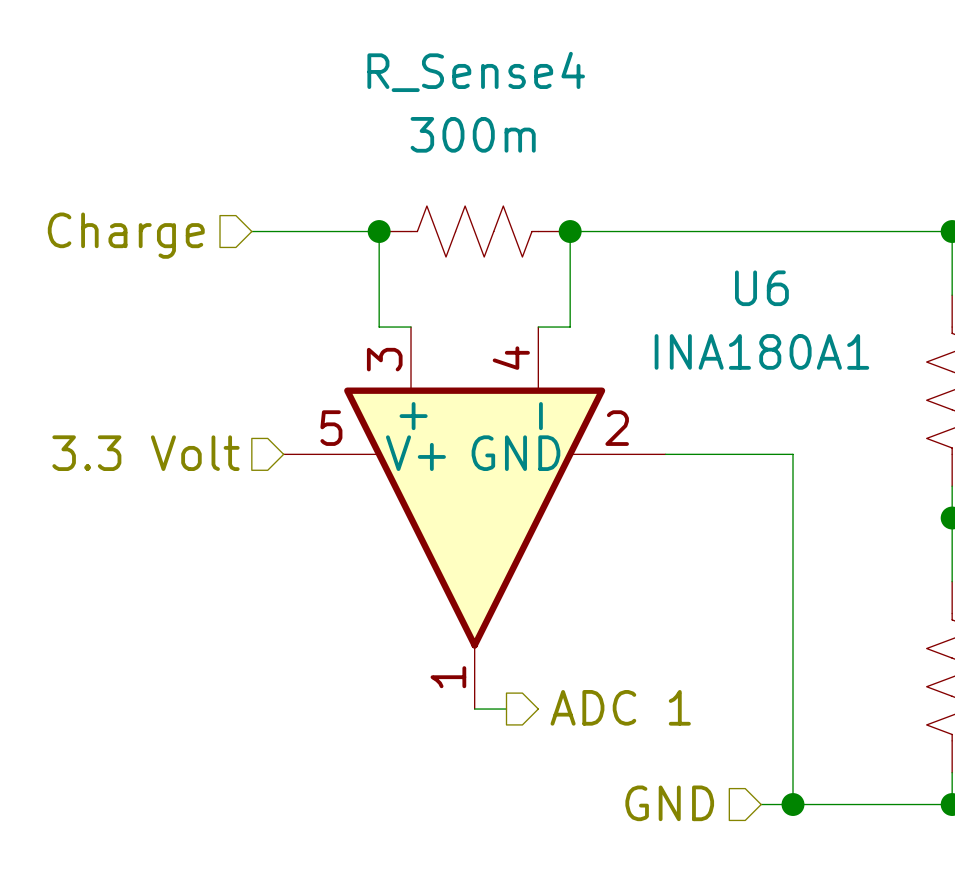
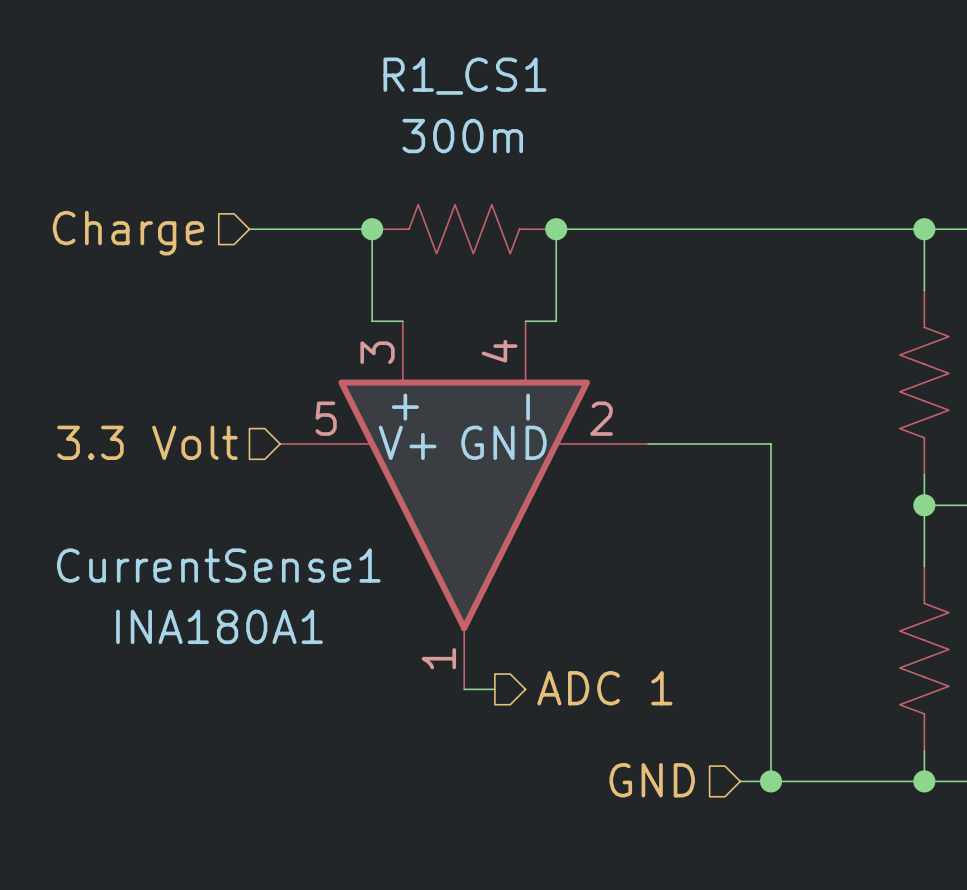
R_Sense4 name: R_Sense4 (476, 71) -> R1_CS1 (464, 76)
U6 name: U6 (761, 288) -> CurrentSense1 (218, 565)
U6 value position: INA180A1 (761, 351) -> INA180A1 (219, 626)

